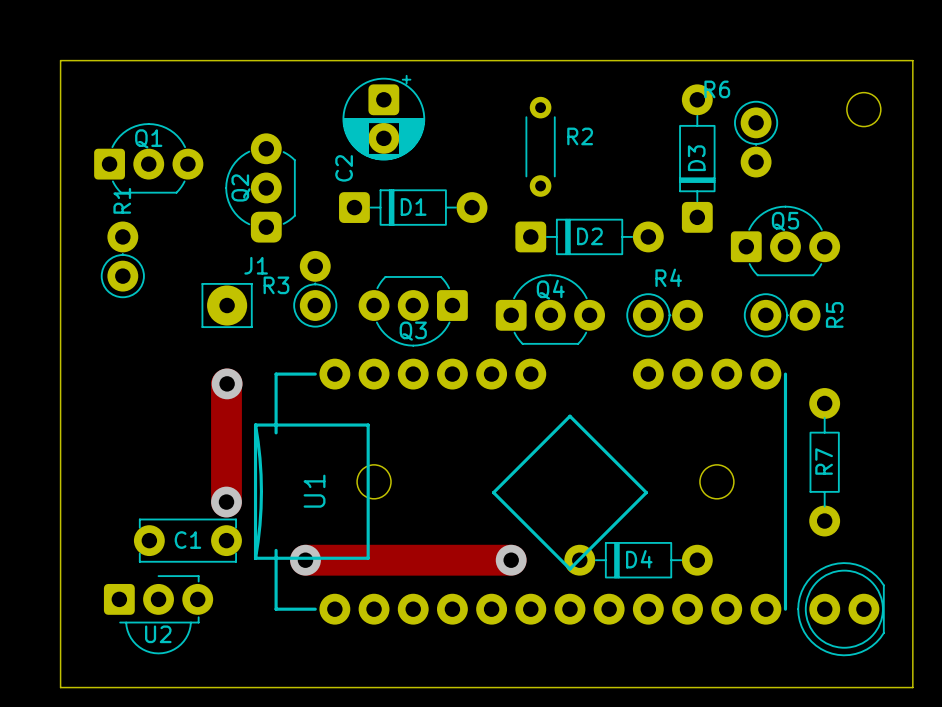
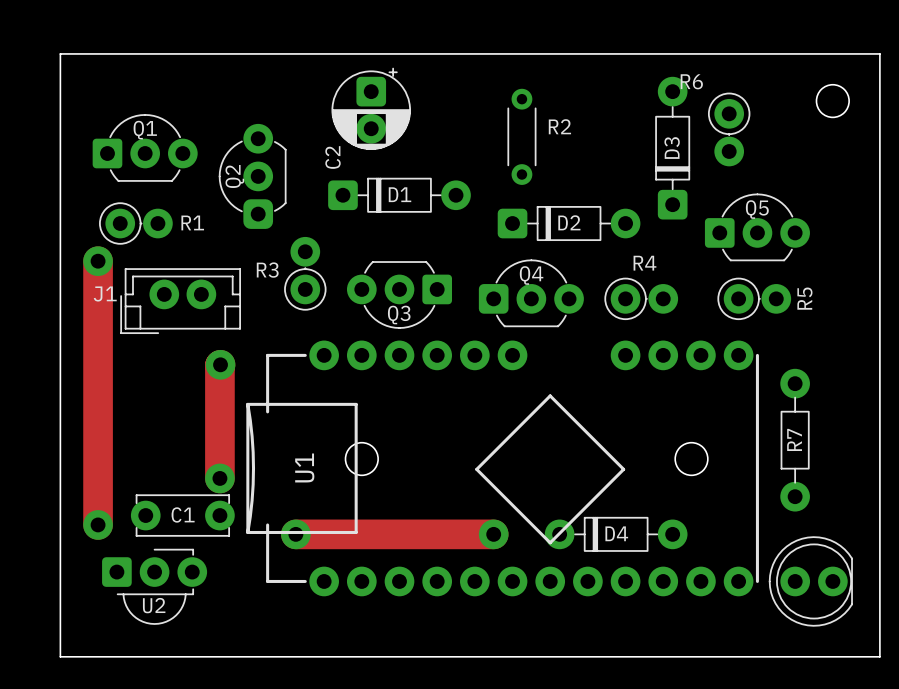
R1 rotation: 0° (122, 259) -> 90° clockwise (135, 223)
J1 name position: J1 (256, 265) -> J1 (105, 293)
track: none -> (98, 261) (98, 524)
via: none -> (98, 261)
J1 footprint: [201, 282, 253, 329] -> [120, 268, 241, 335]
via: none -> (98, 524)

